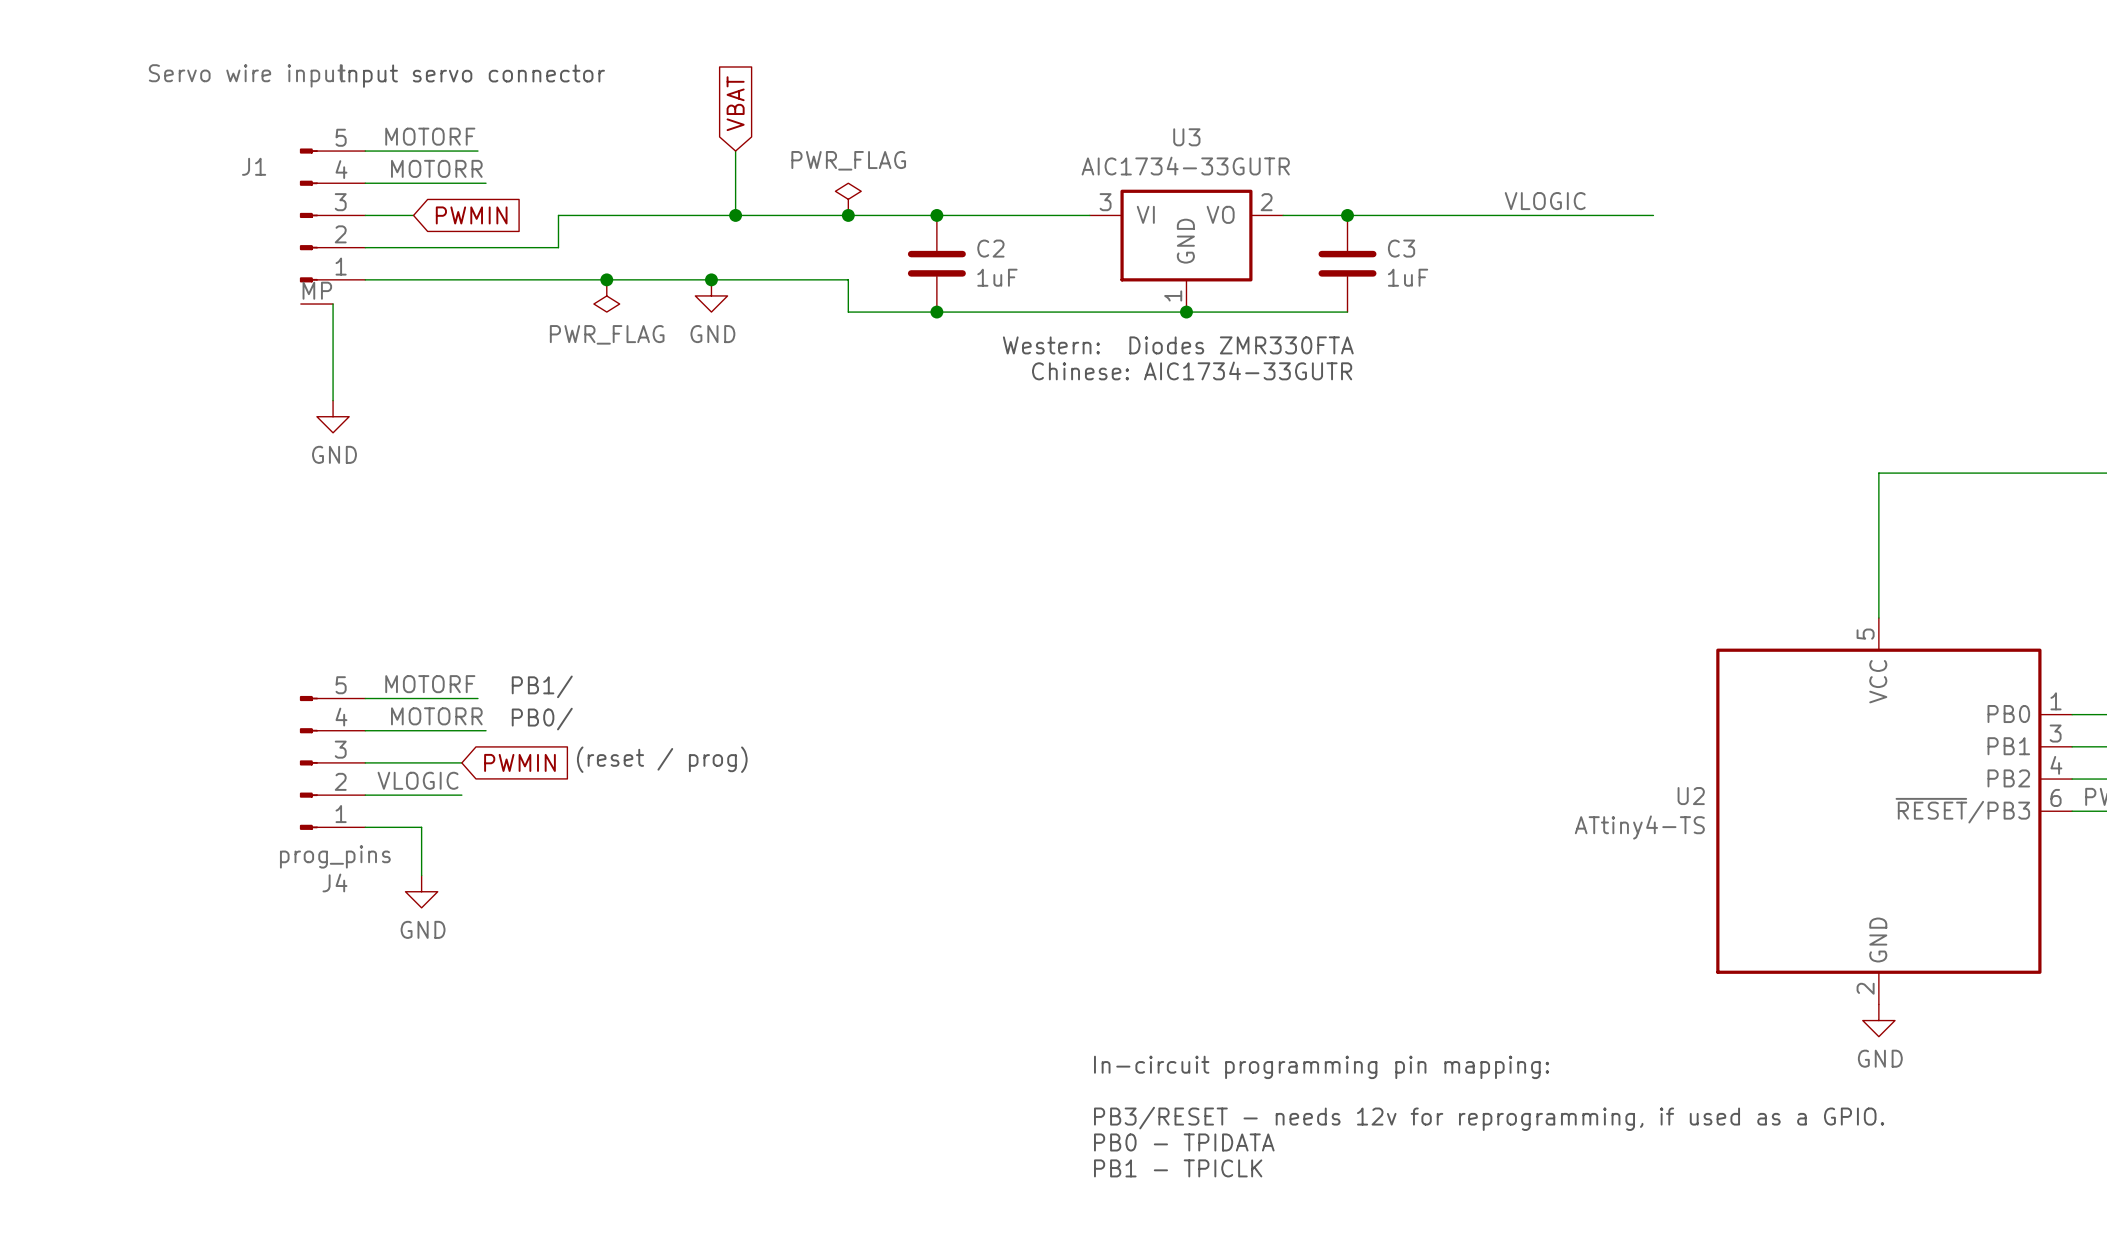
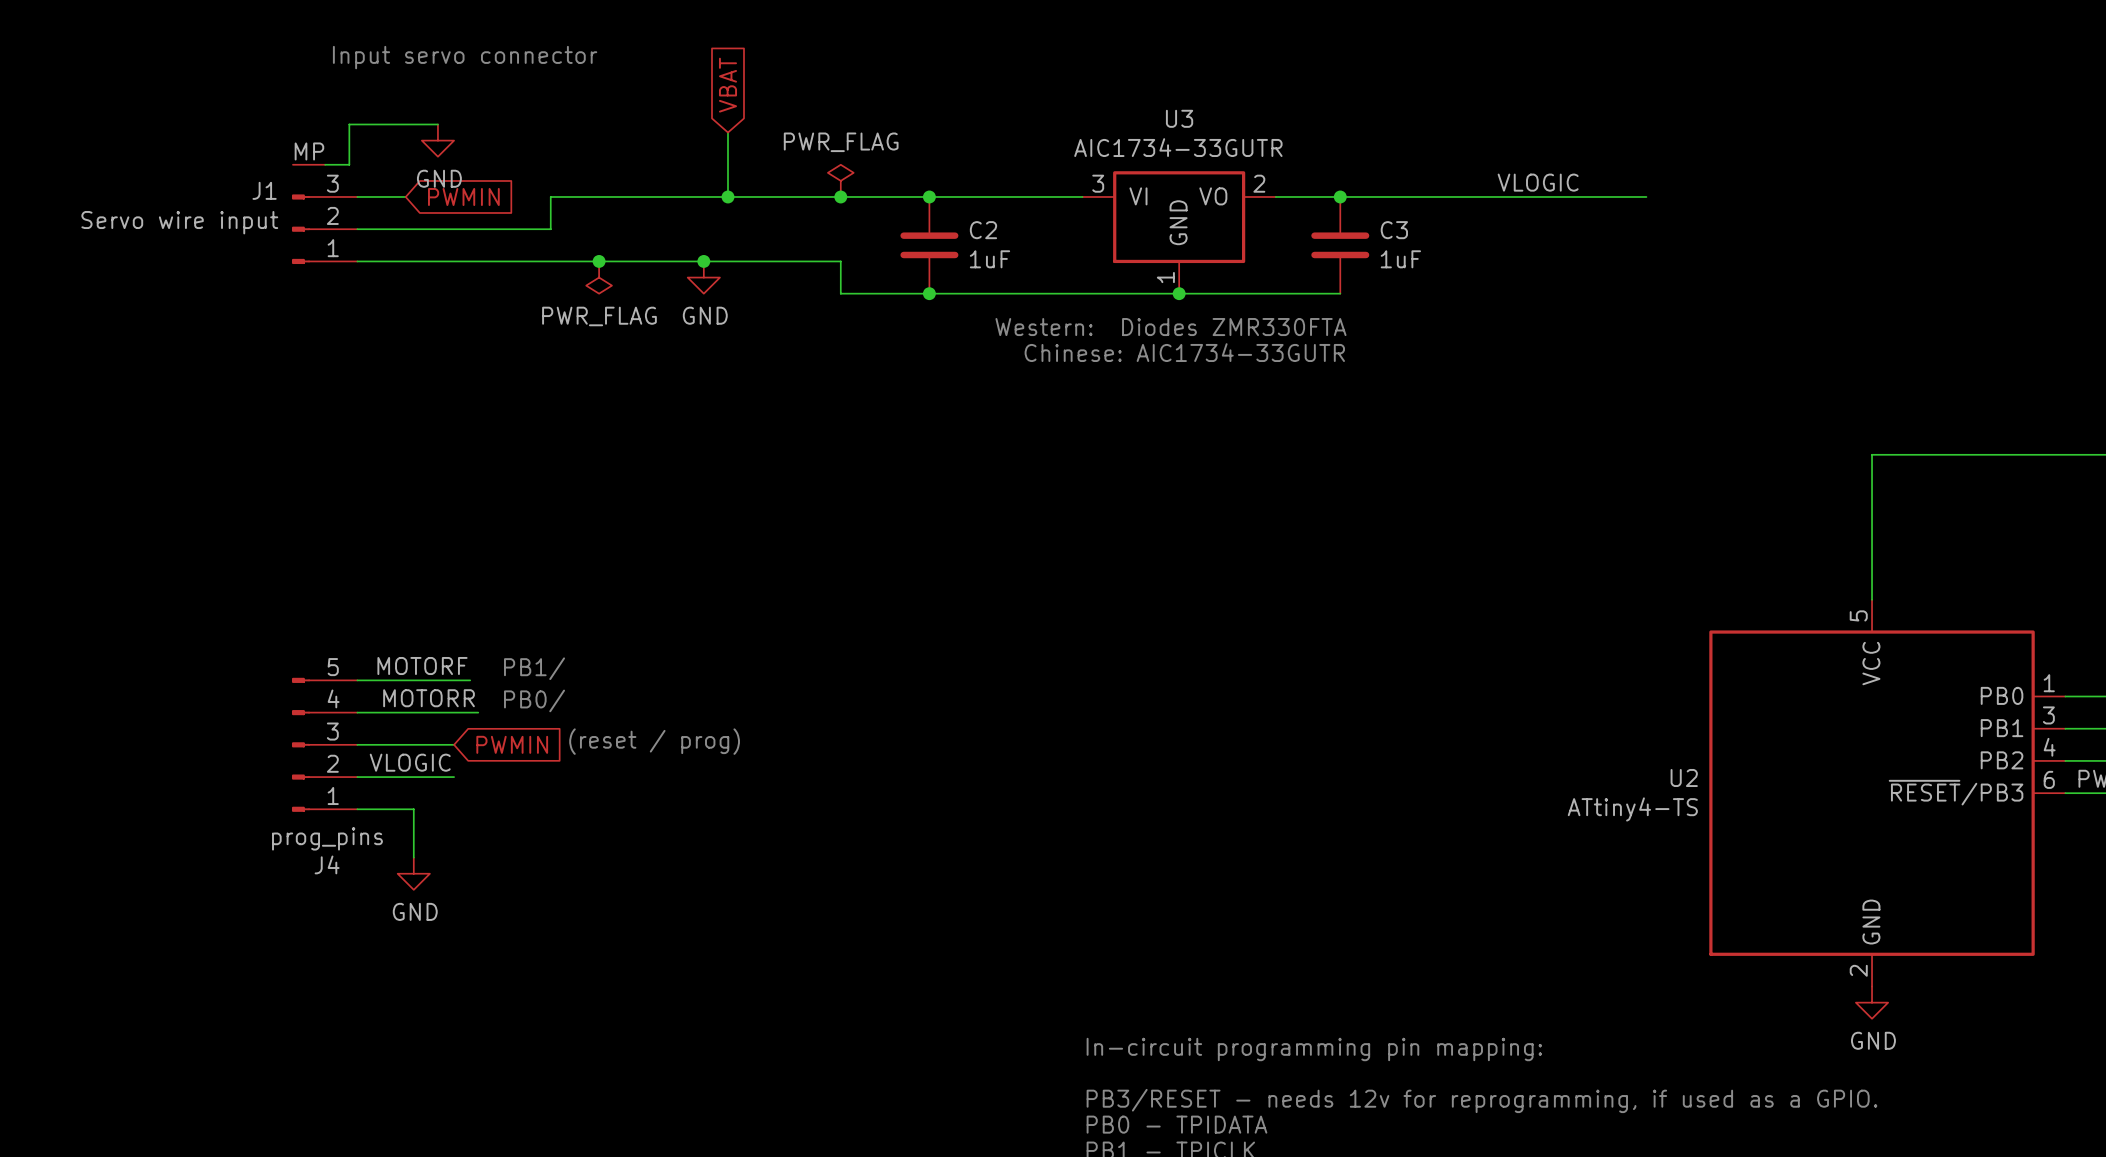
J1 value position: Servo wire input (247, 75) -> Servo wire input (179, 222)
label: MOTORF (430, 136) -> none
wire: none -> (437, 124) (349, 124) (349, 164) (325, 164)
J1 symbol: [299, 148, 366, 305] -> [291, 164, 358, 265]
wire: (365, 151) (477, 151) -> none
J1 name position: J1 (254, 166) -> J1 (264, 190)
label: MOTORR (436, 168) -> none
wire: (365, 183) (486, 183) -> none
wire: (333, 304) (333, 400) -> none
power symbol position: GND (333, 416) -> GND (437, 140)

